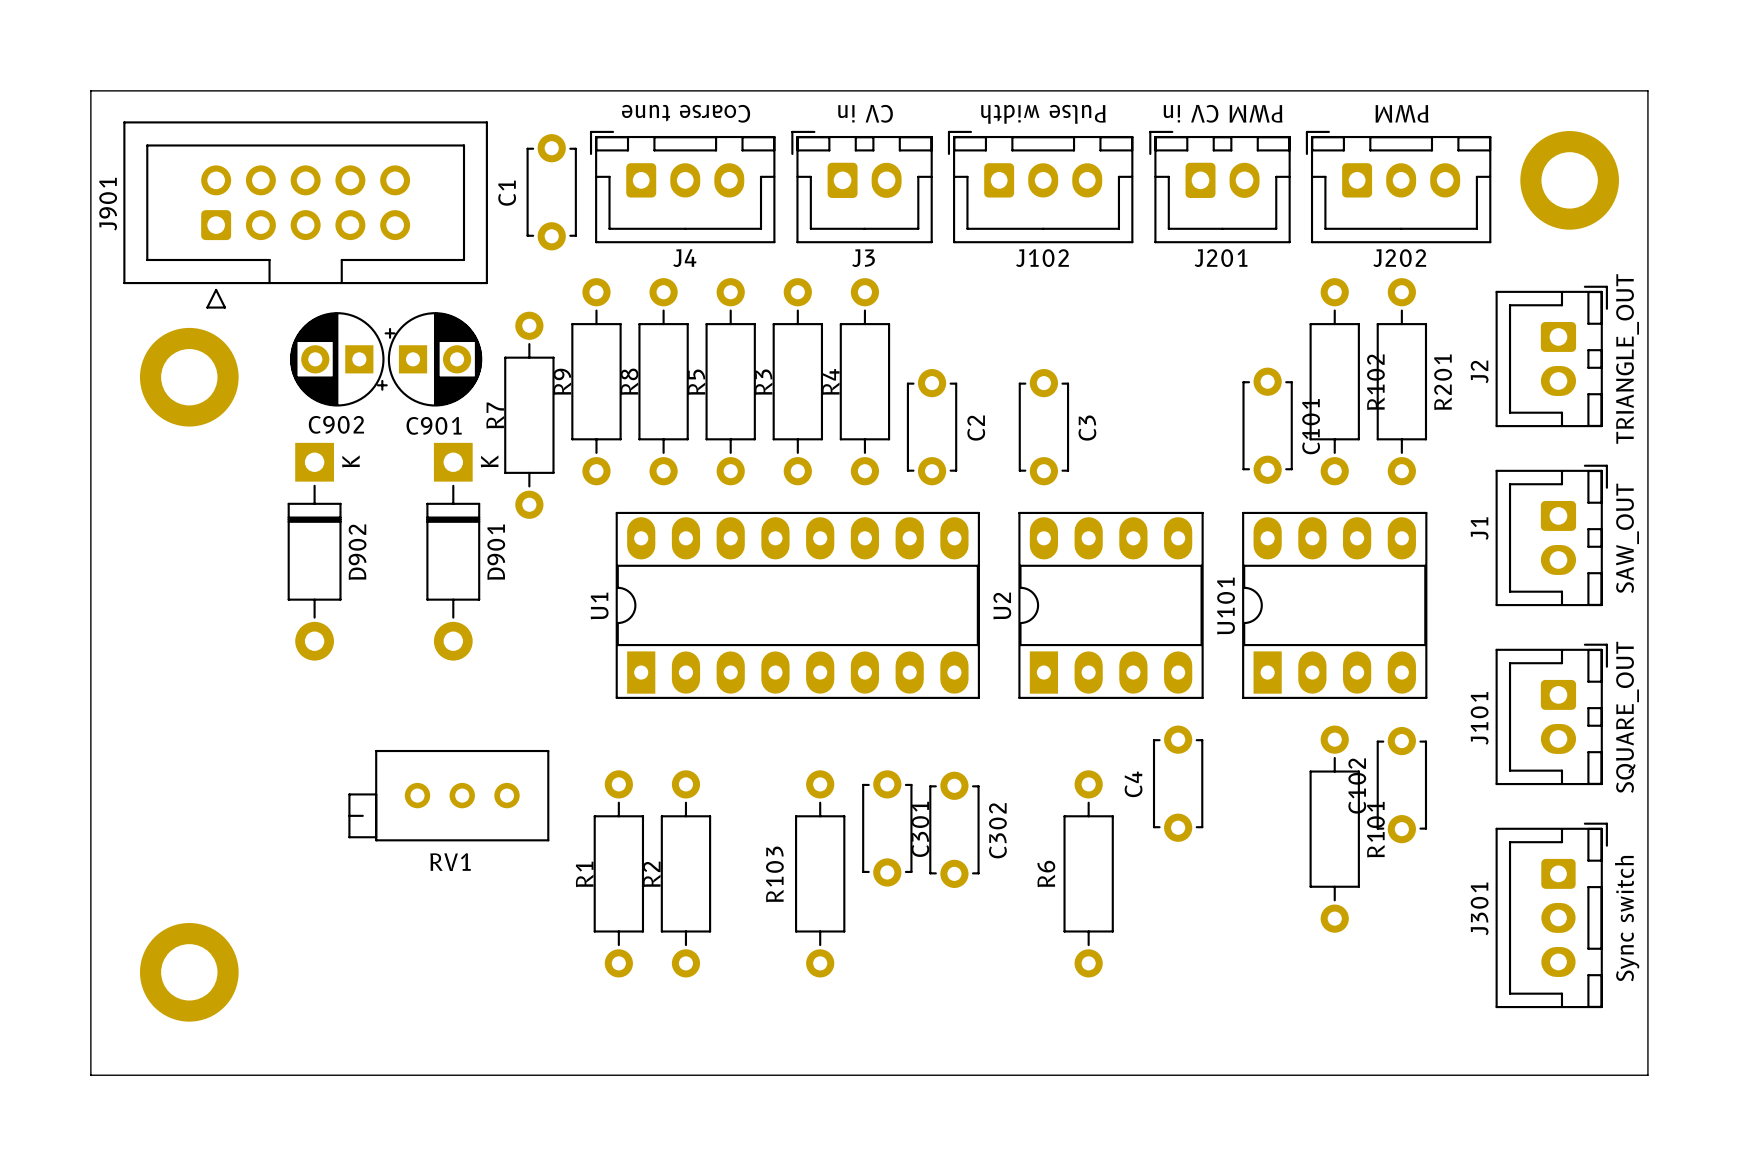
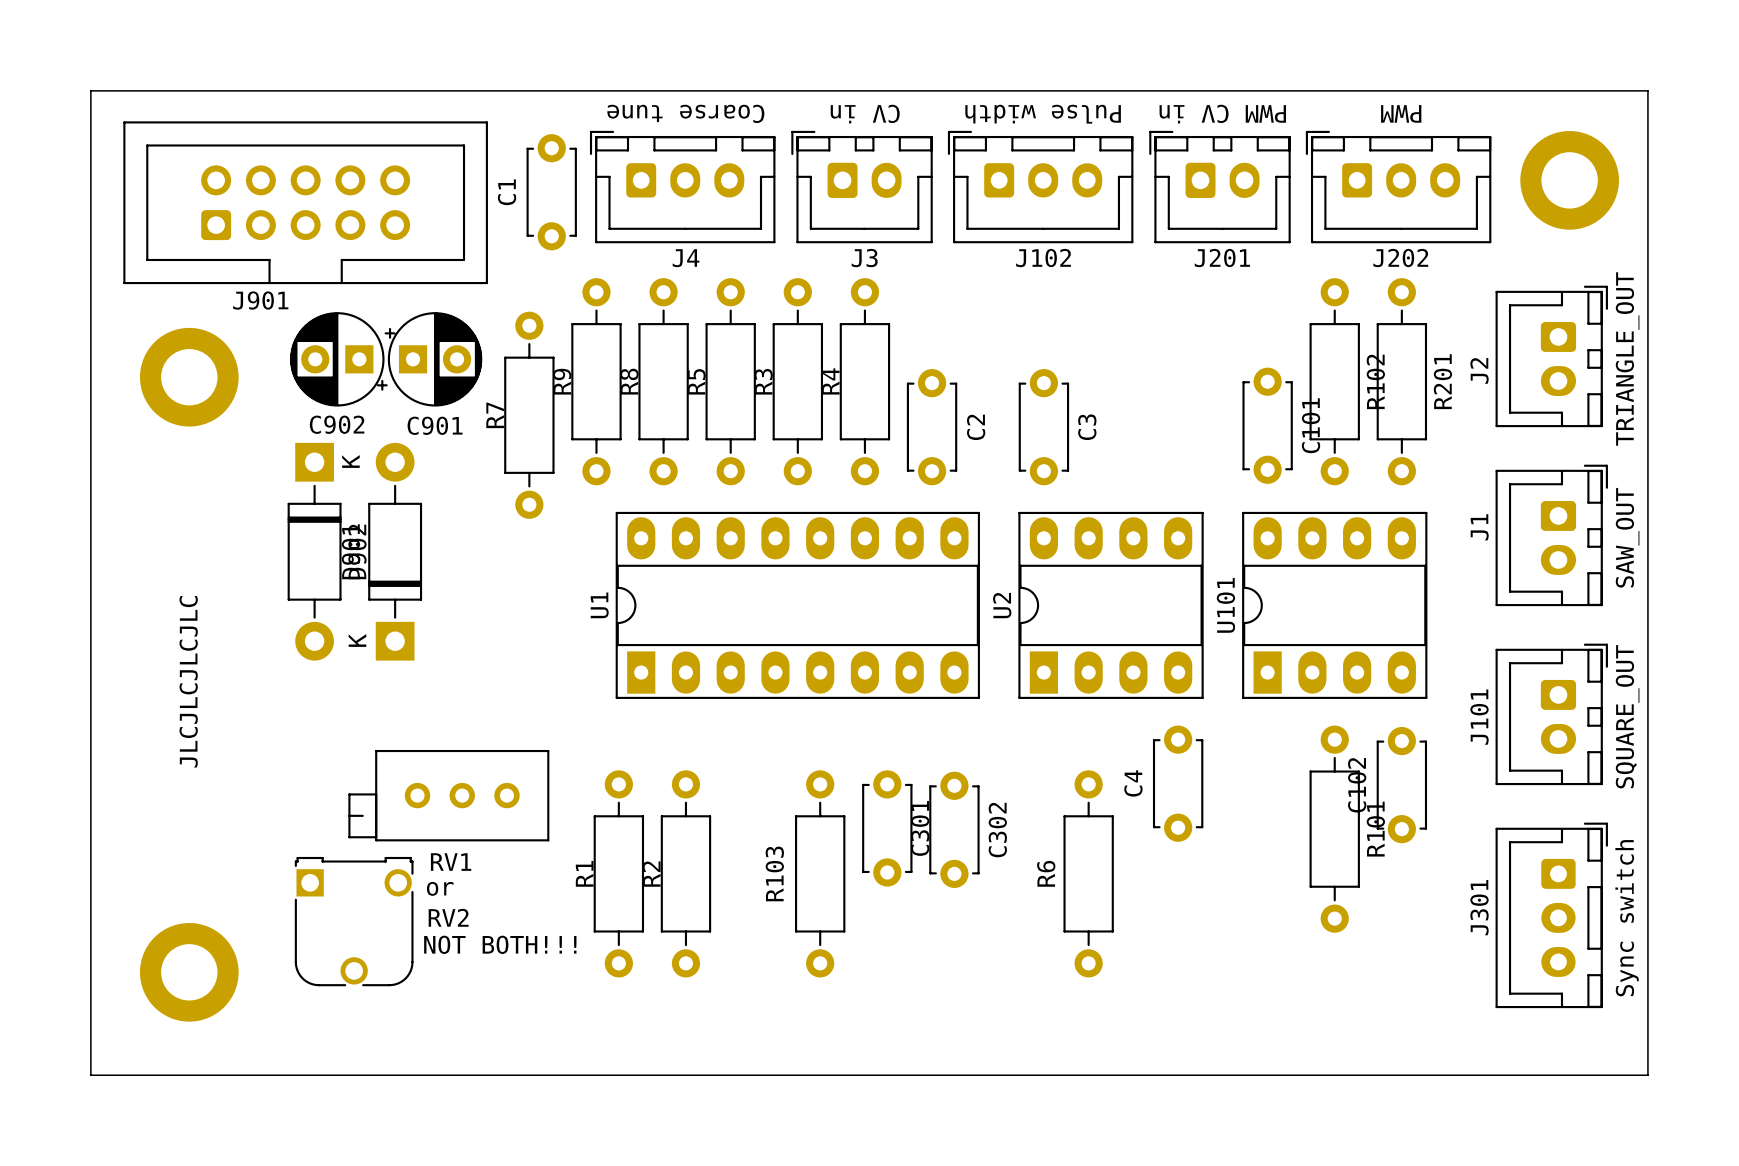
J901 footprint: [123, 121, 488, 309] -> [123, 121, 488, 285]
J901 name position: J901 (108, 204) -> J901 (260, 300)
D901 rotation: 0° (453, 551) -> 180° (395, 551)
text: none -> JLCJLCJLCJLC (188, 681)
text: none -> or (440, 888)
RV2: none -> (354, 921)
text: none -> NOT BOTH!!! (500, 944)

